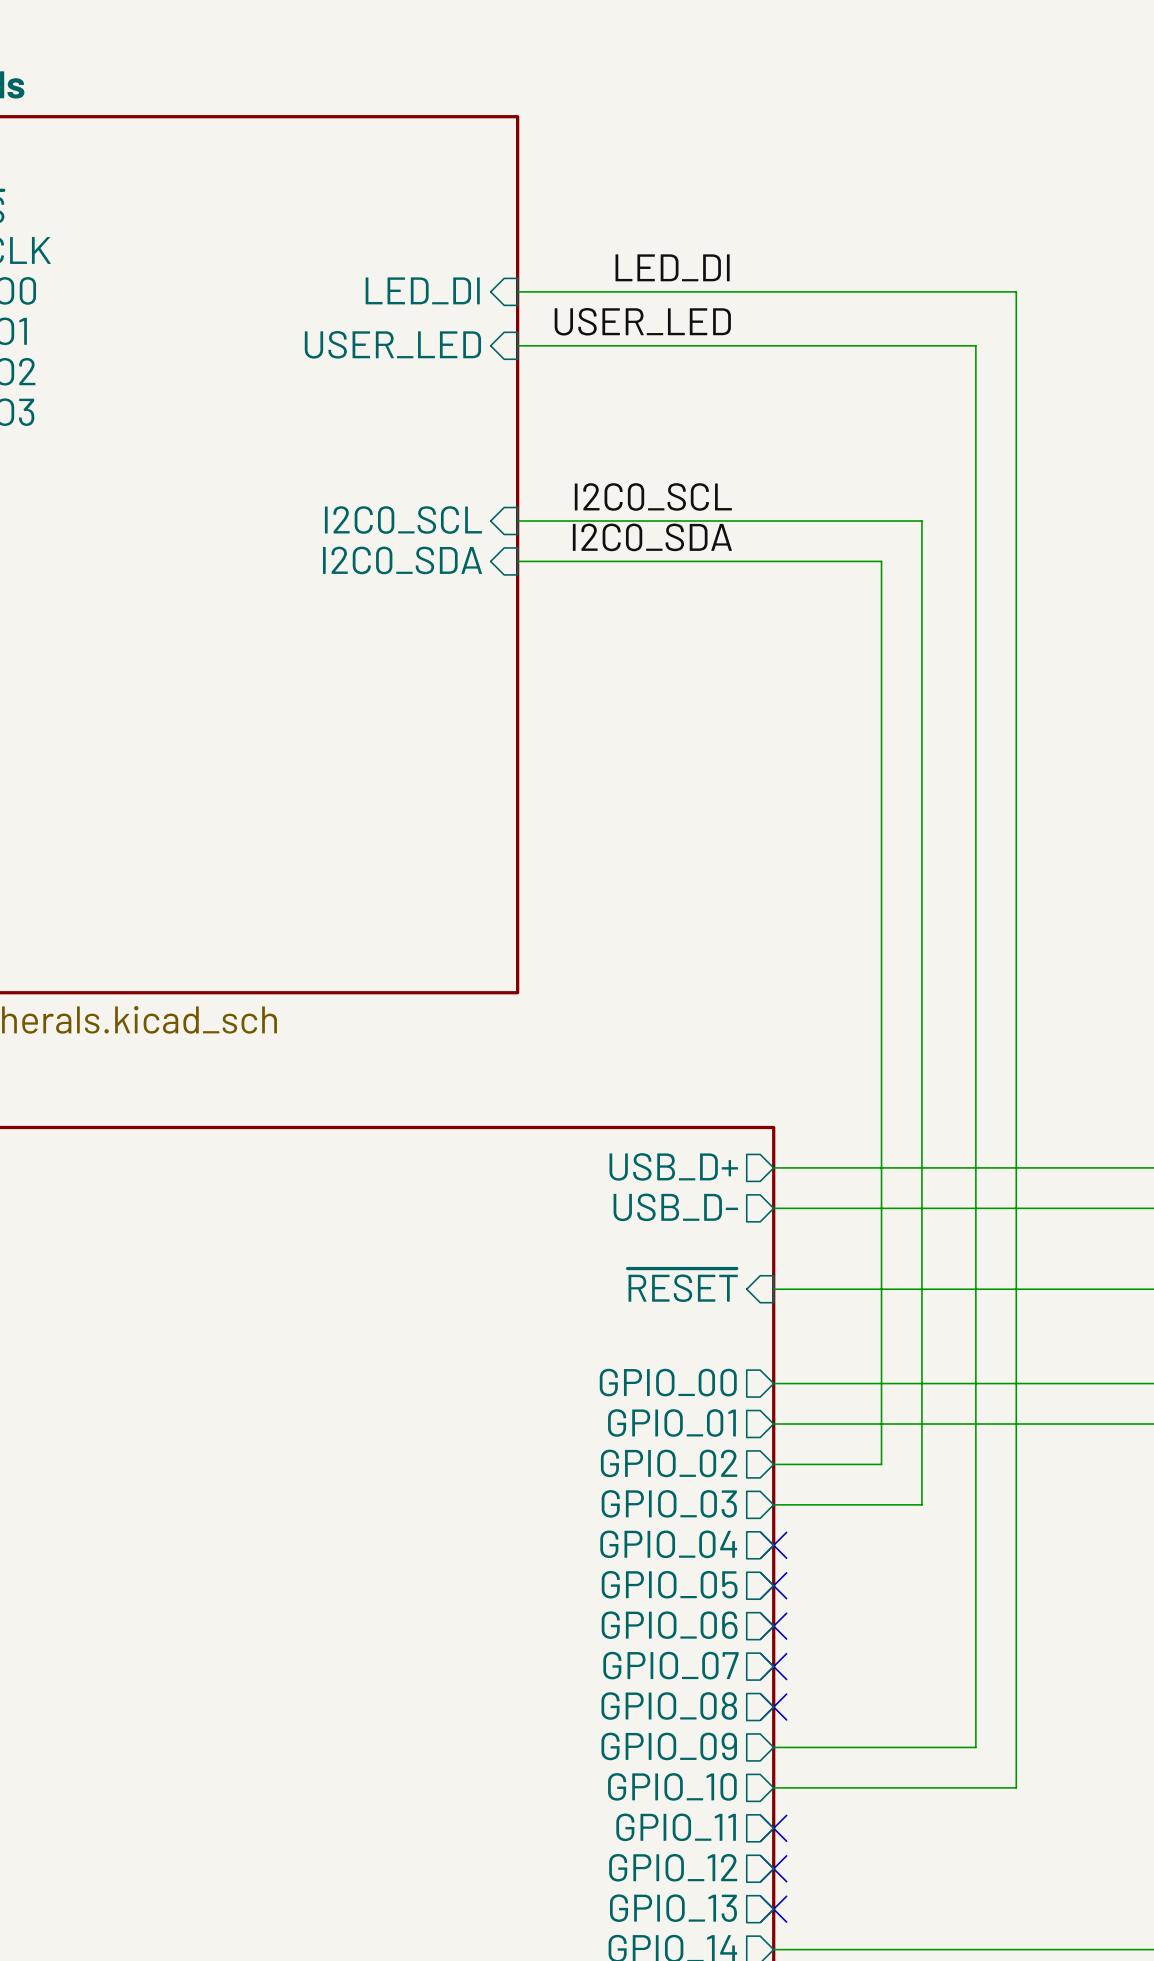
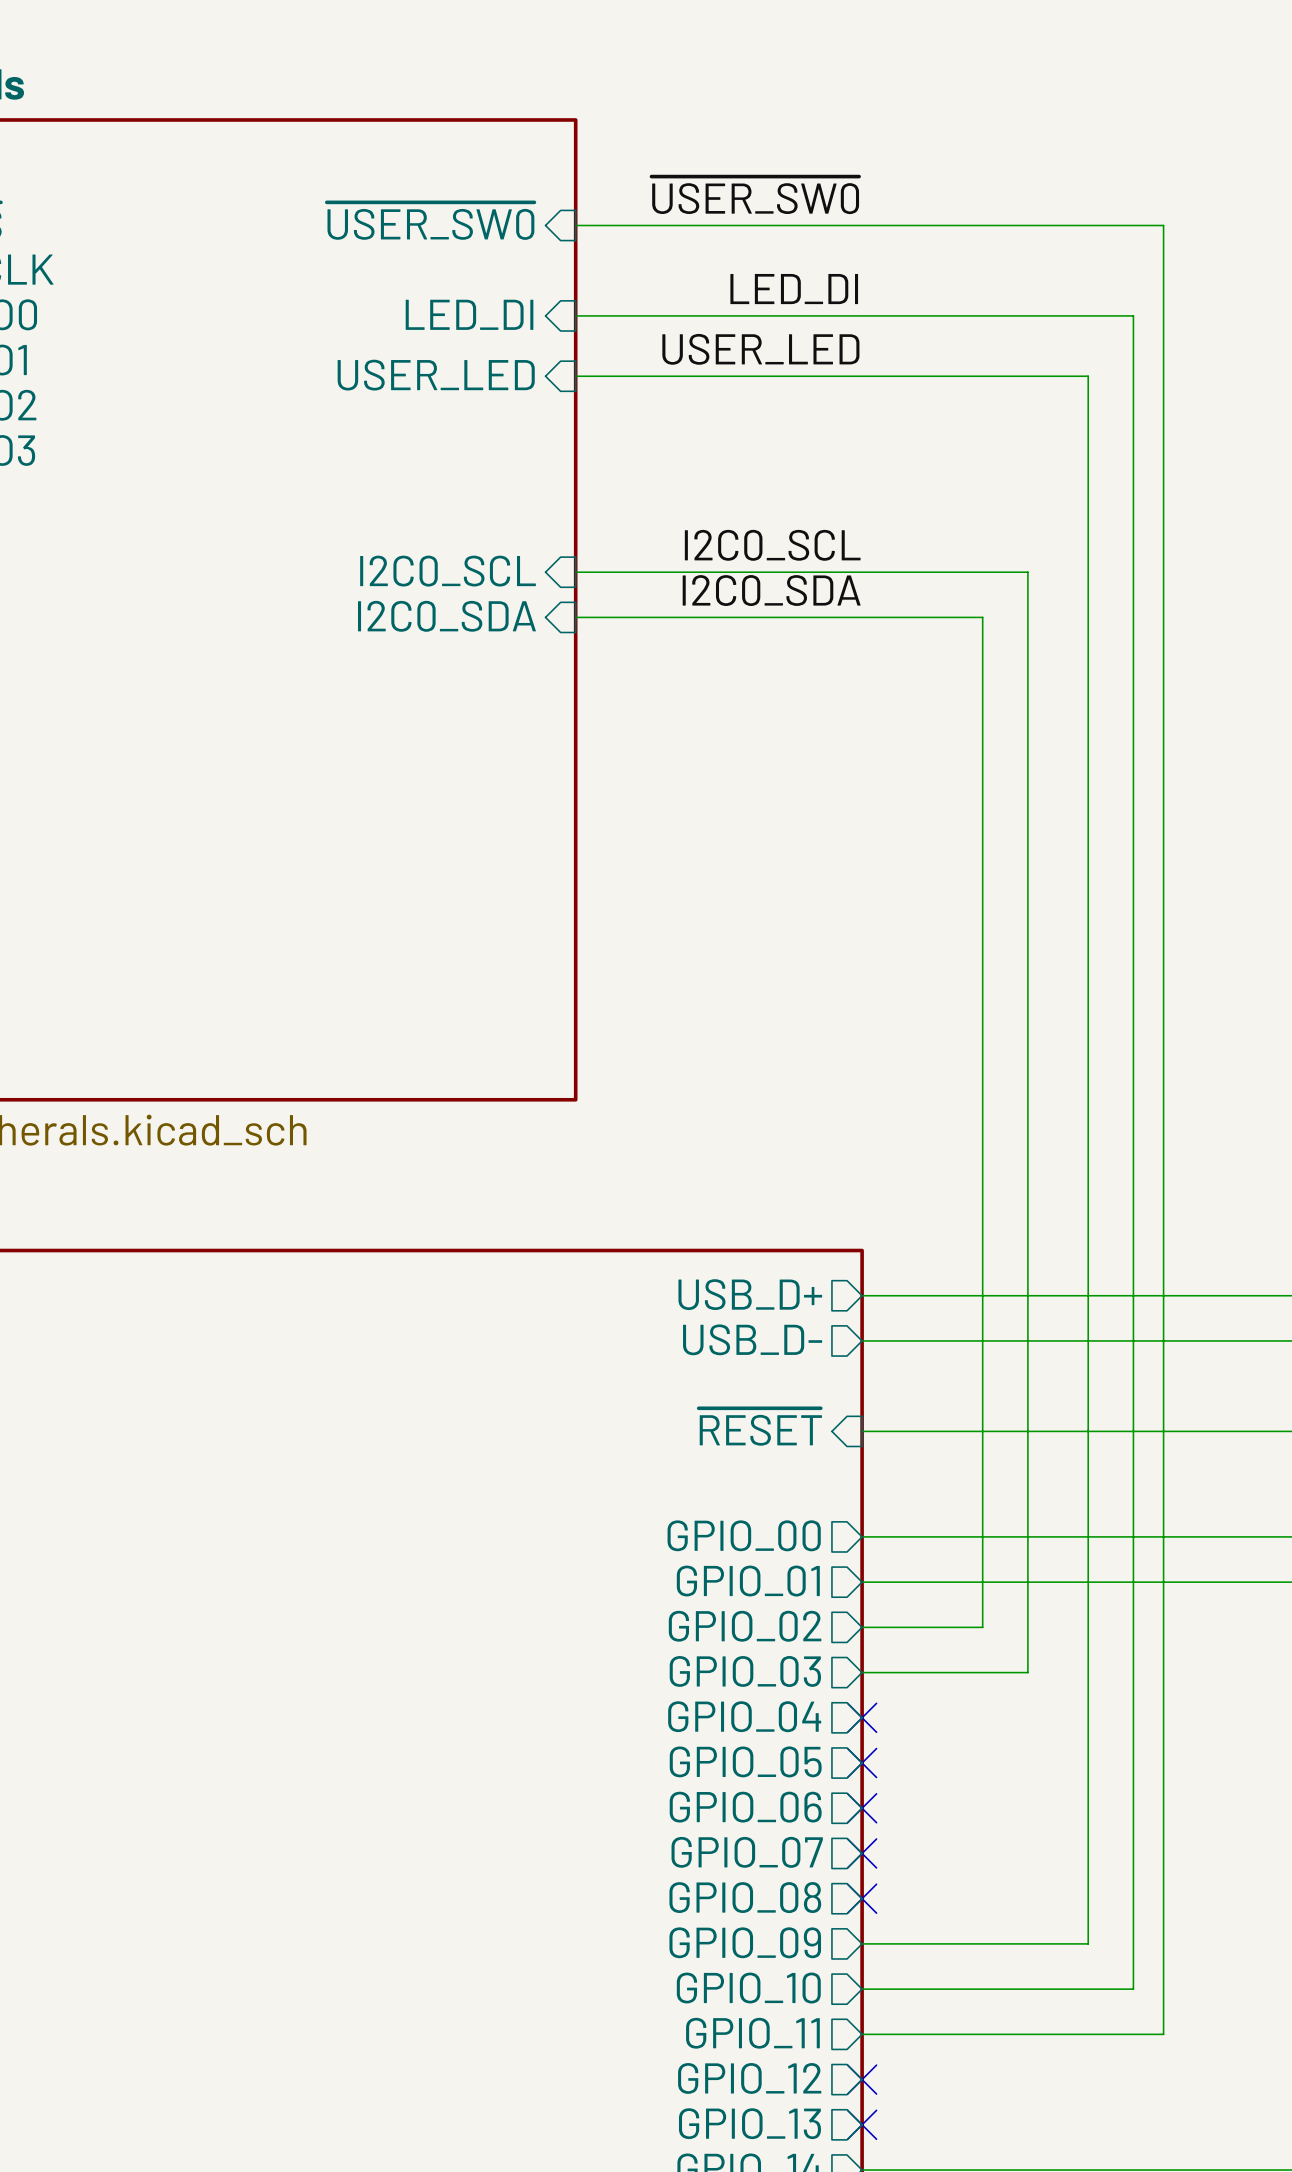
label: none -> ~{USER_SW0} (755, 195)
sheet pin: none -> ~{USER_SW0} (430, 221)
wire: none -> (575, 225) (1163, 225) (1163, 2034) (862, 2034)
label position: LED_DI (672, 267) -> LED_DI (794, 289)
label position: USER_LED (642, 321) -> USER_LED (760, 349)
label position: I2C0_SCL (653, 496) -> I2C0_SCL (772, 545)
label position: I2C0_SDA (652, 537) -> I2C0_SDA (771, 590)
no-connect mark: (773, 1828) -> none

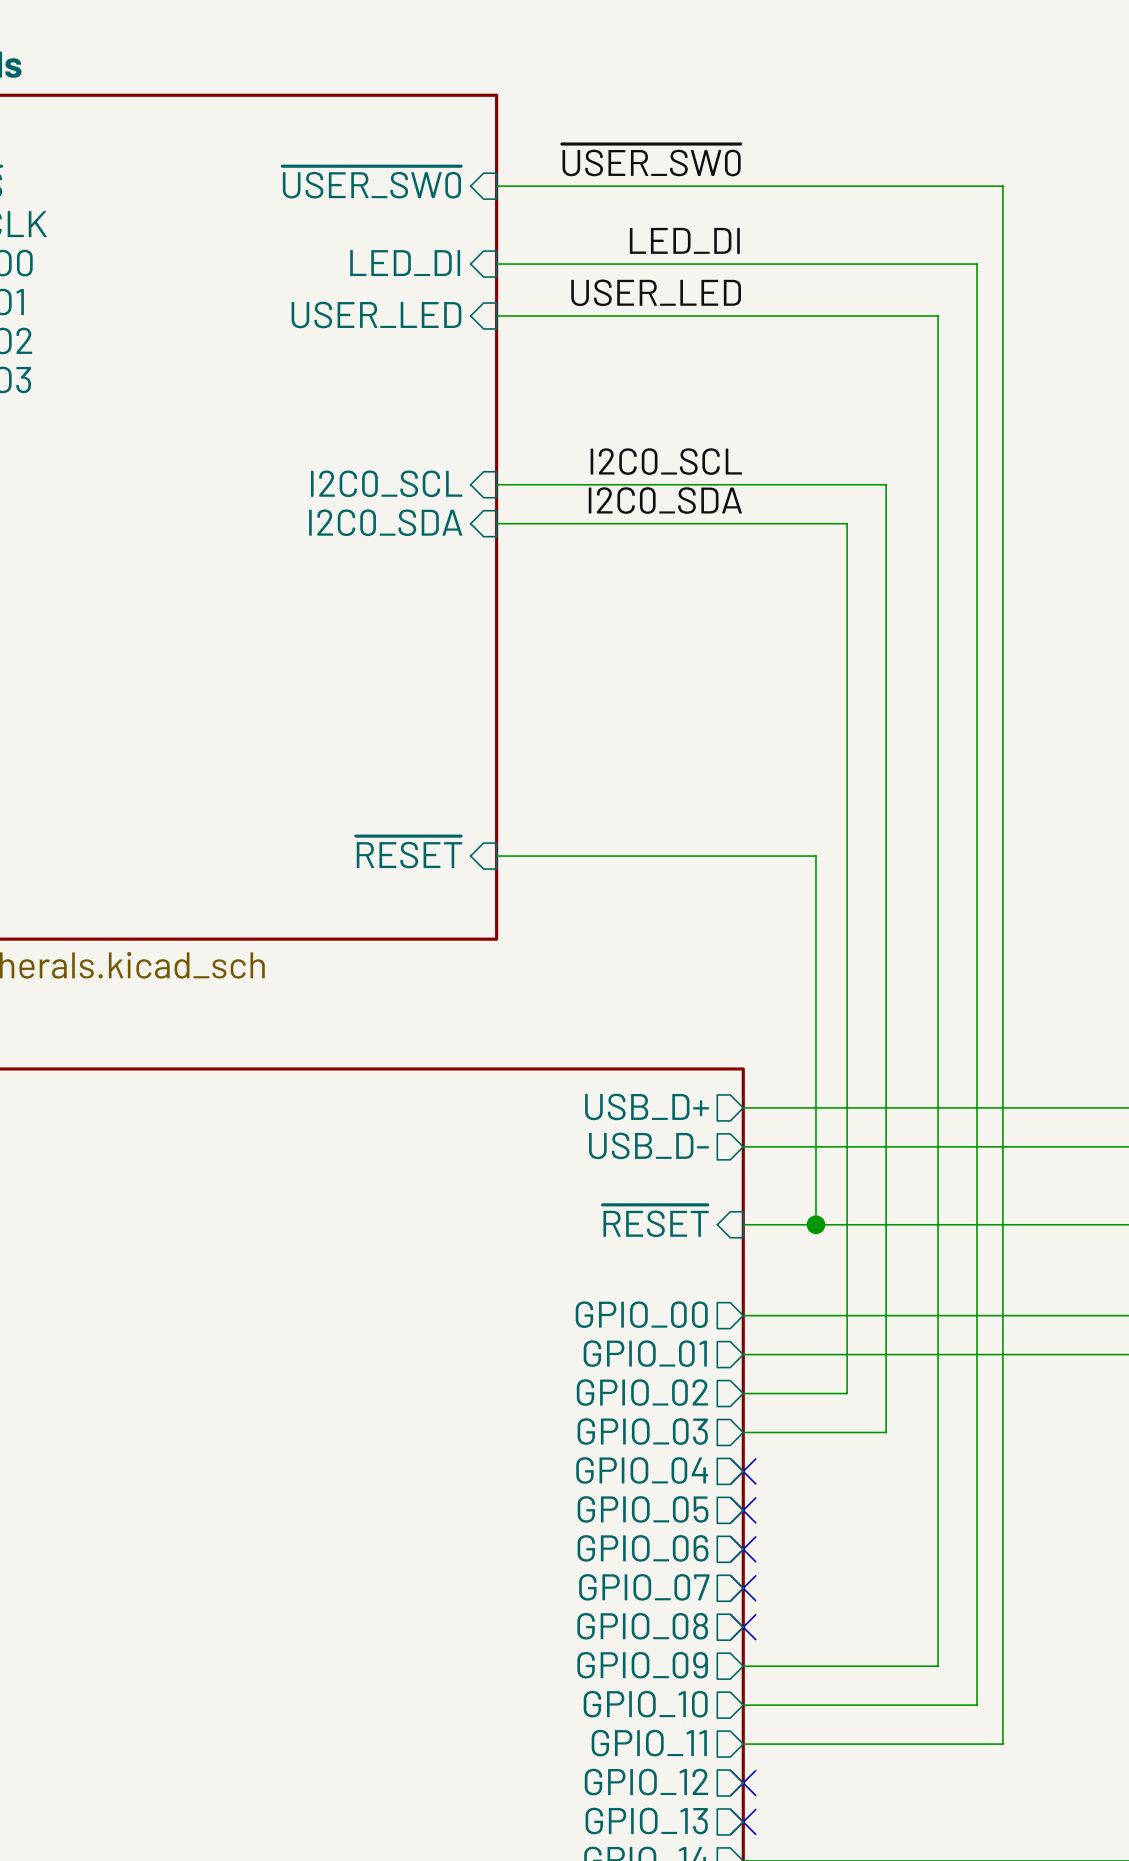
sheet pin: none -> ~{RESET} (408, 852)
wire: none -> (496, 856) (815, 856) (815, 1224)
junction: none -> (815, 1224)

